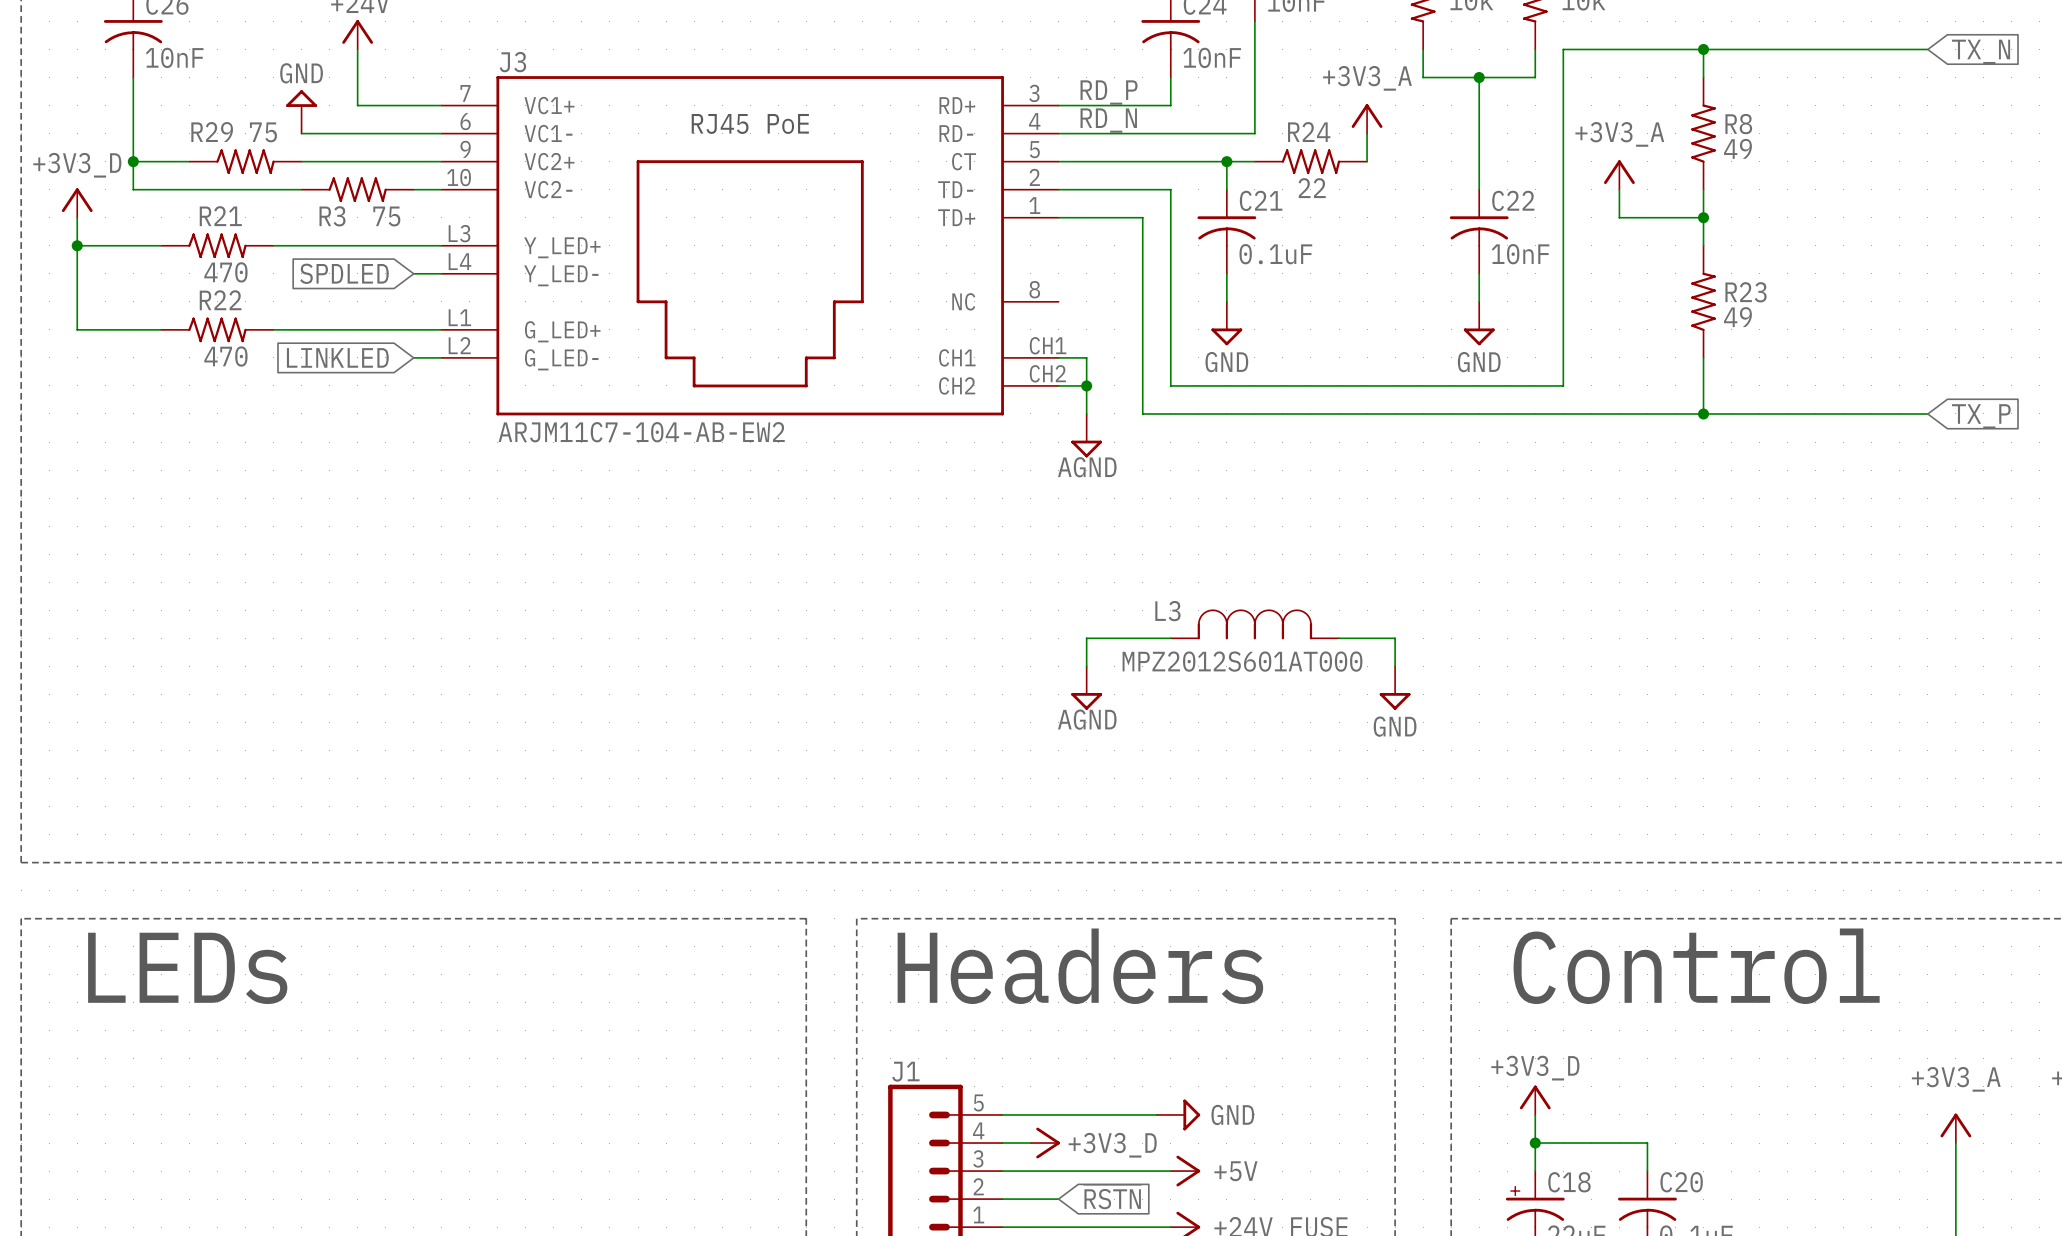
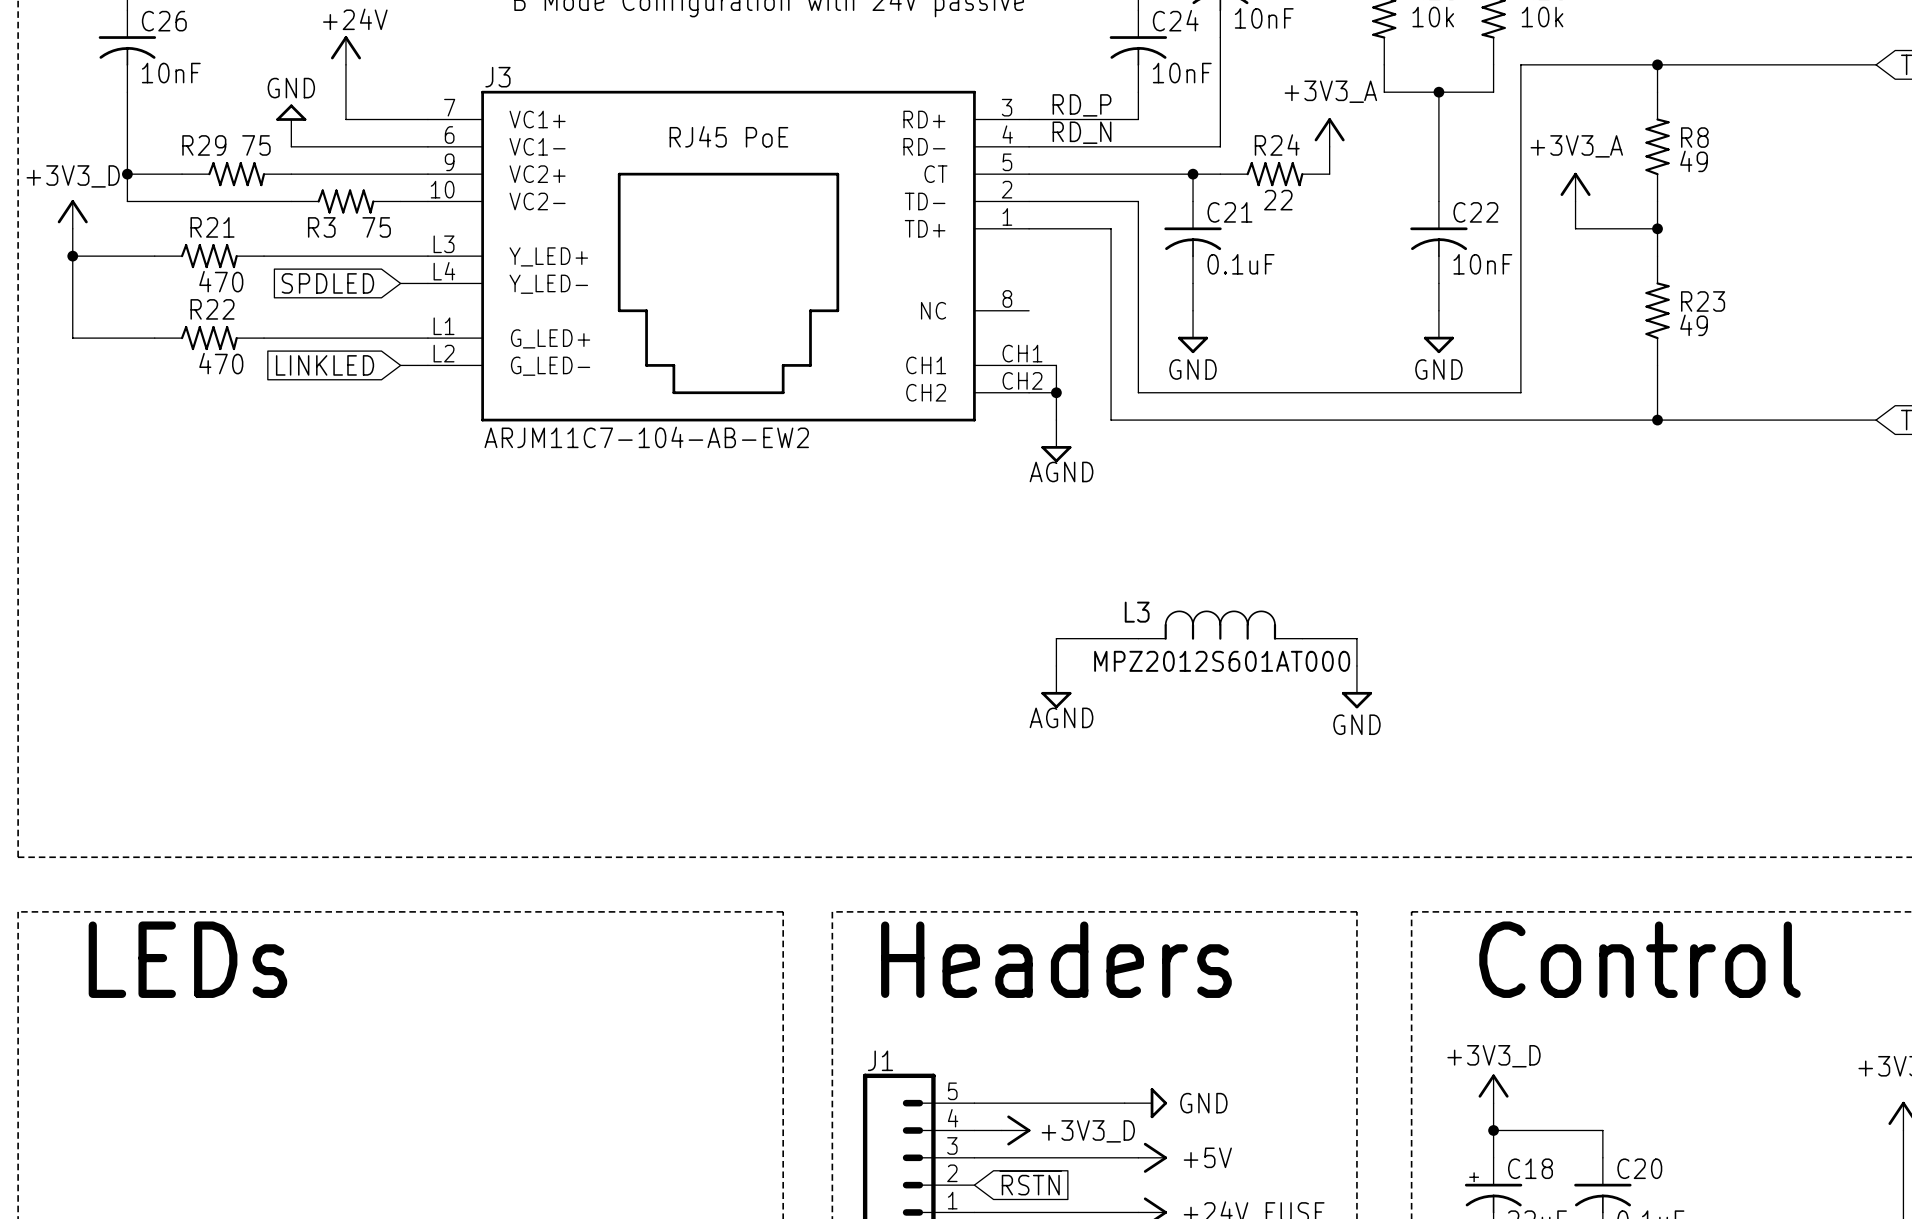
global label position: ~{RSTN} (1112, 1197) -> ~{RSTN} (1030, 1182)
wire: (1002, 1199) (1058, 1199) -> none

